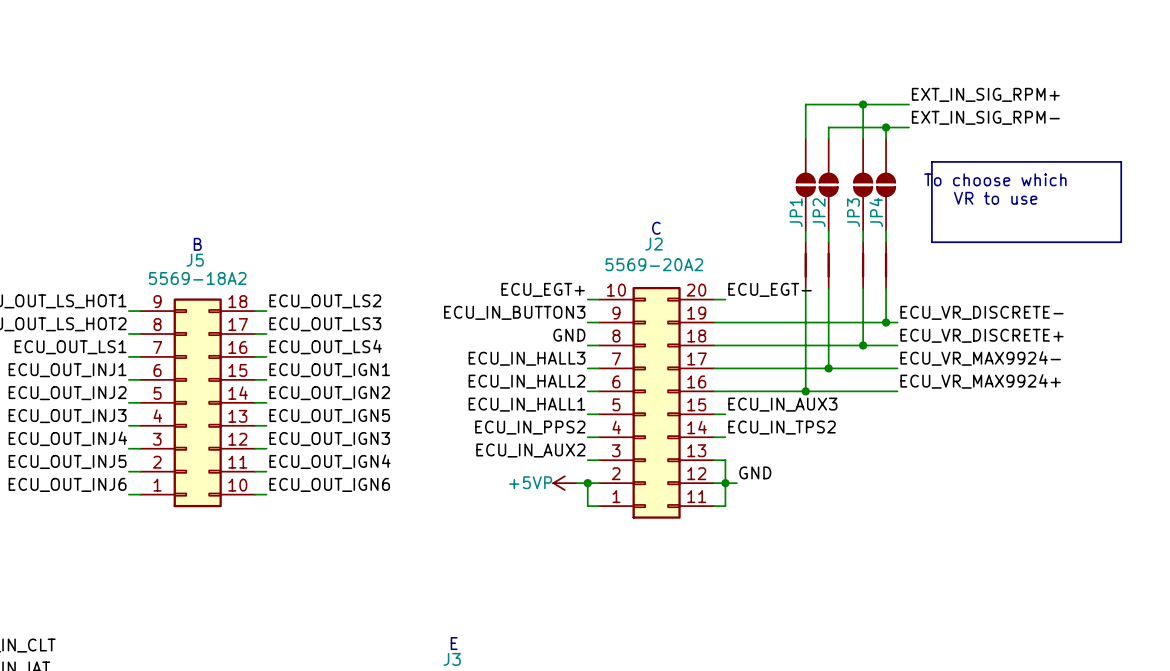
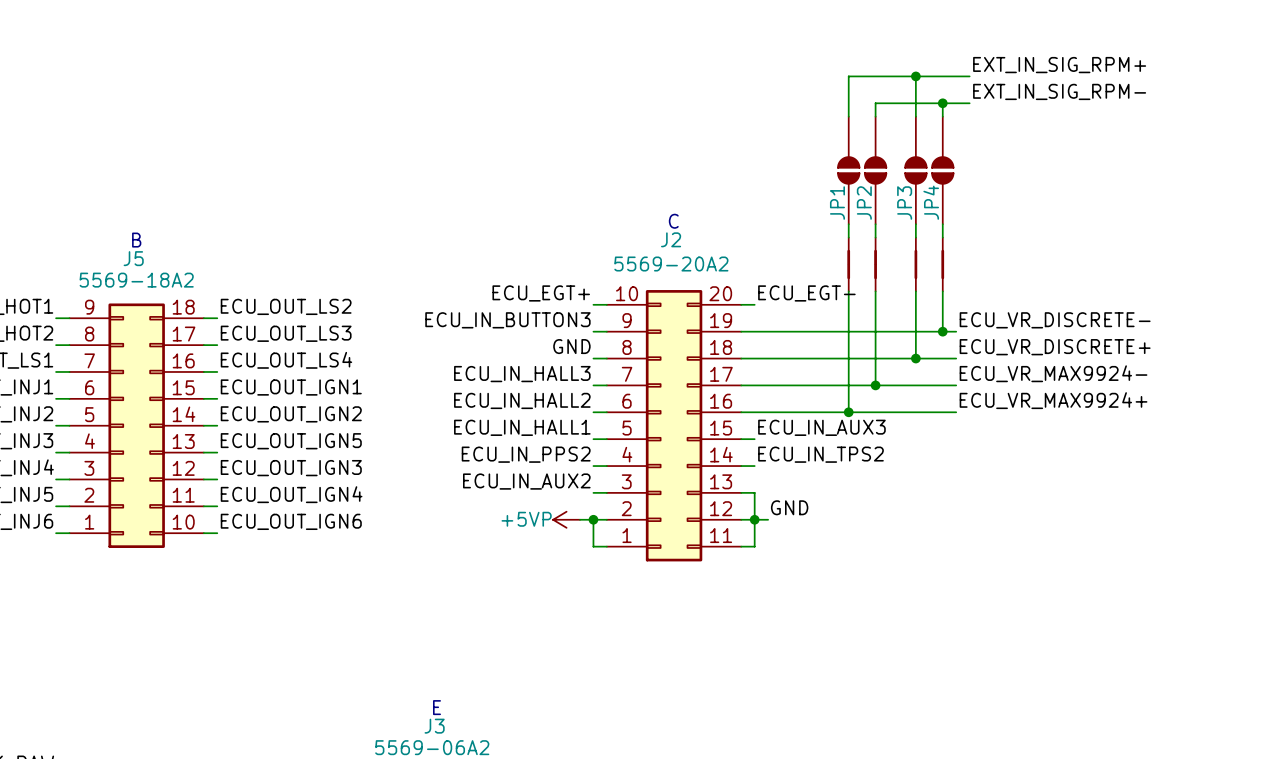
line: (931, 161) (1121, 161) (1121, 242) (931, 242) (931, 161) -> none
text: To choose which (995, 179) -> none
text: VR to use (995, 198) -> none

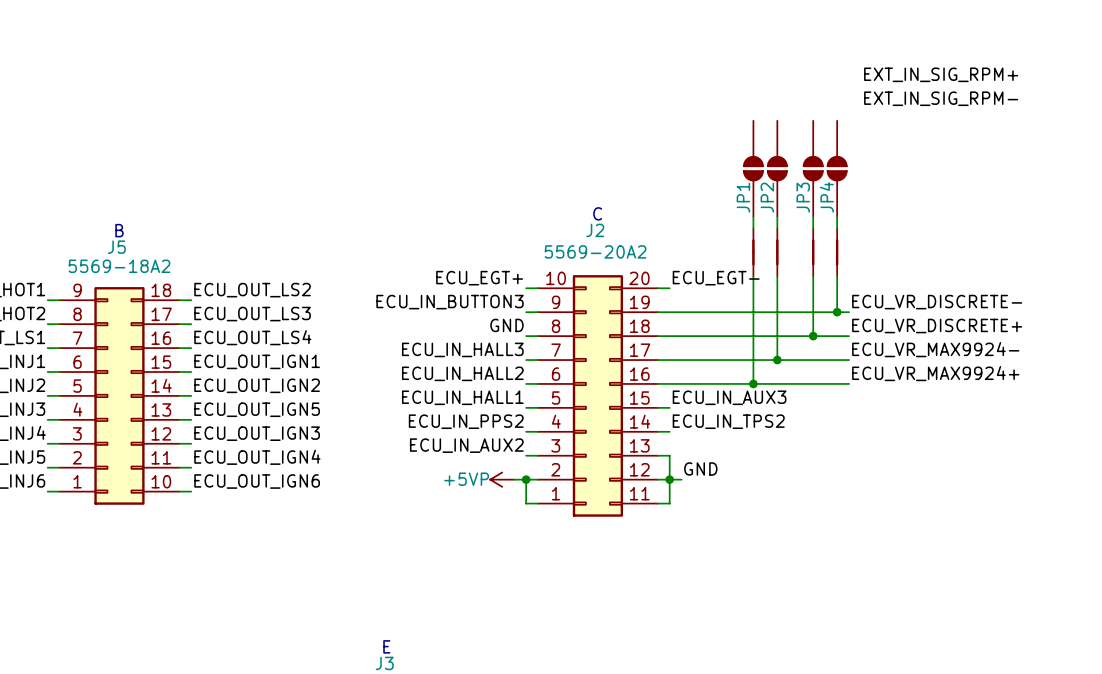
wire: (915, 76) (915, 116) -> none
junction: (915, 76) -> none
wire: (969, 76) (848, 76) (848, 116) -> none
wire: (942, 103) (942, 116) -> none
junction: (942, 103) -> none
wire: (969, 103) (875, 103) (875, 116) -> none

